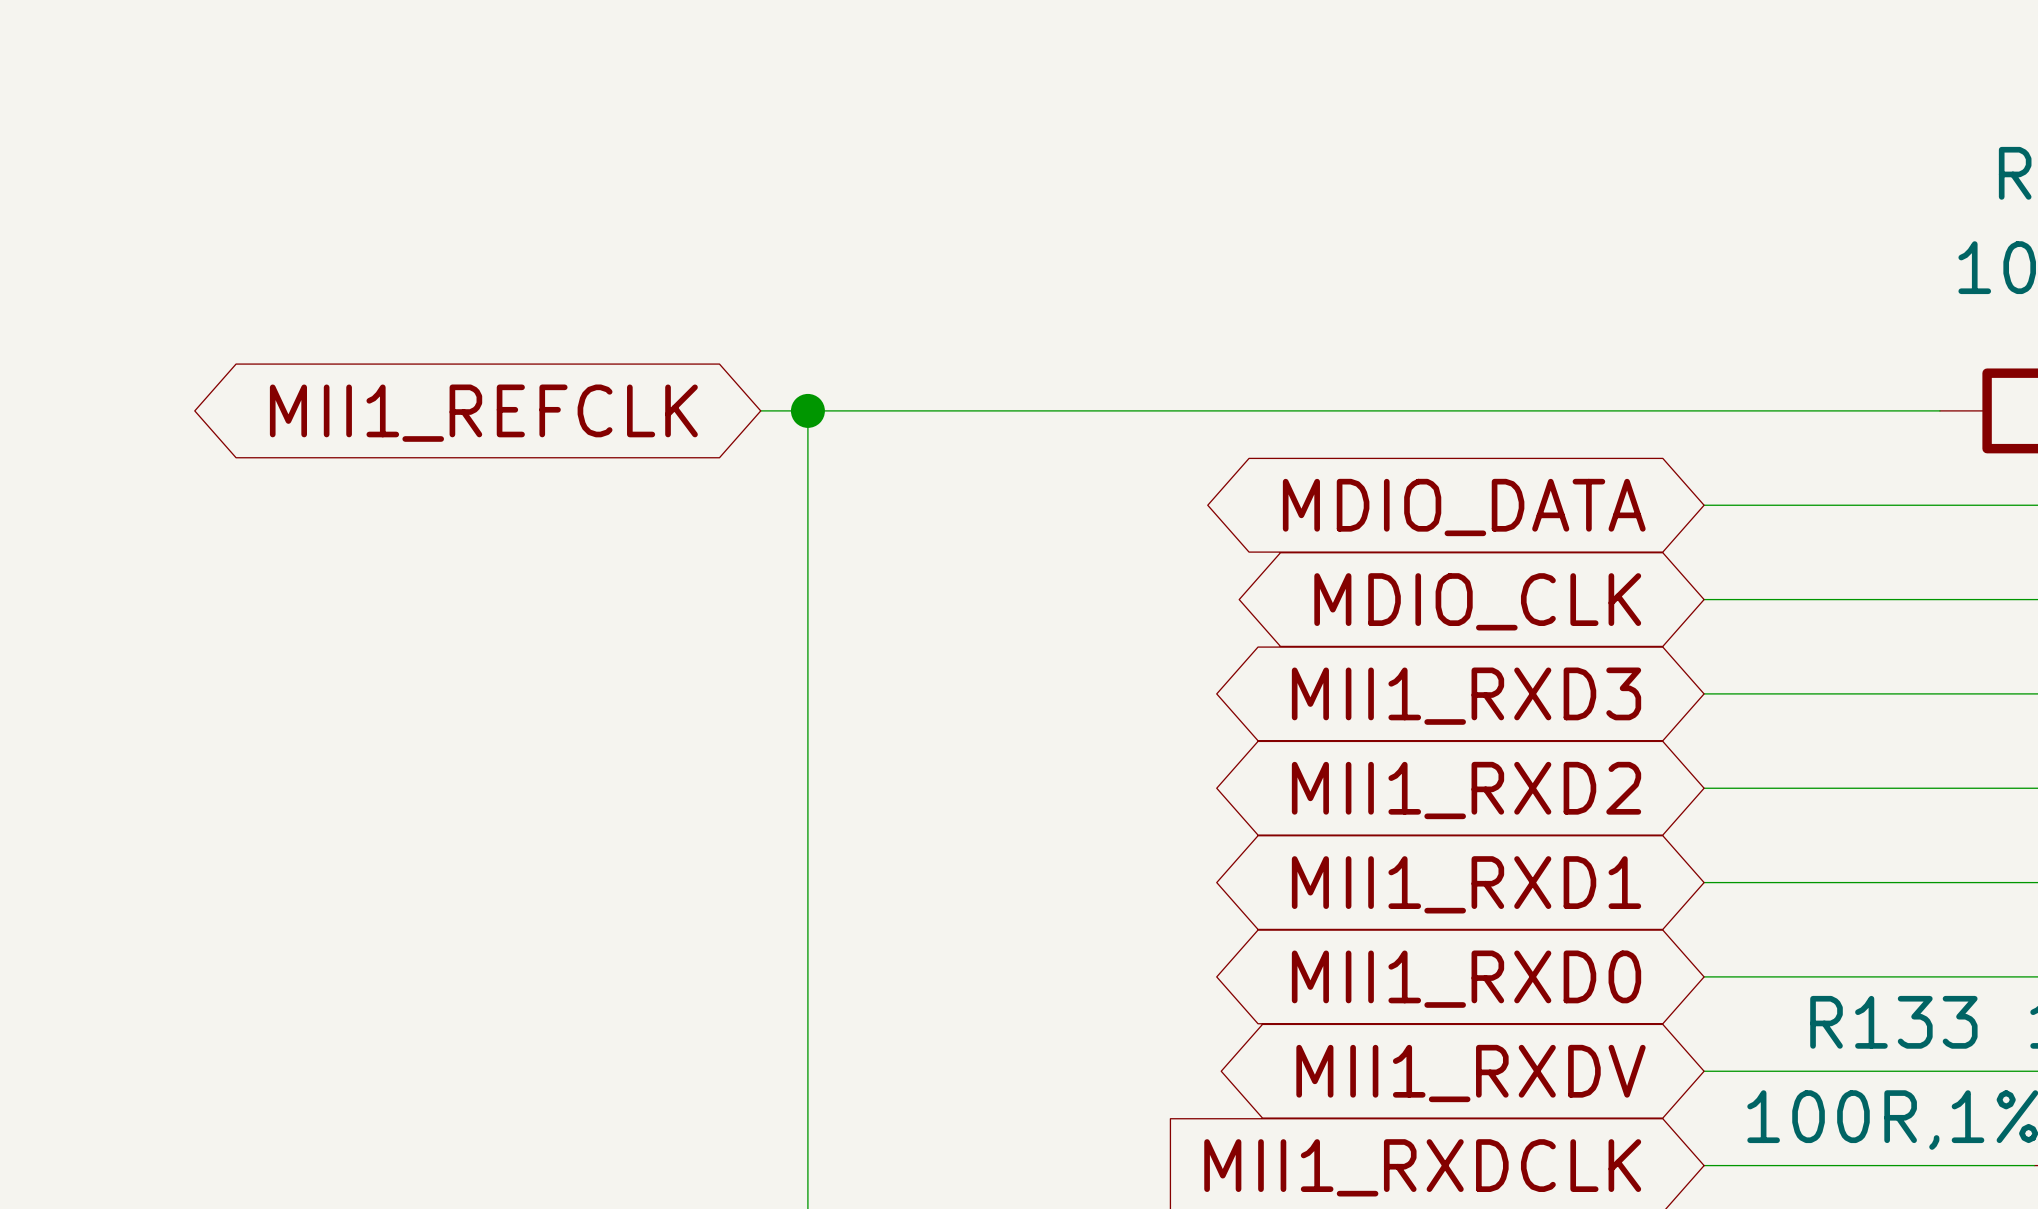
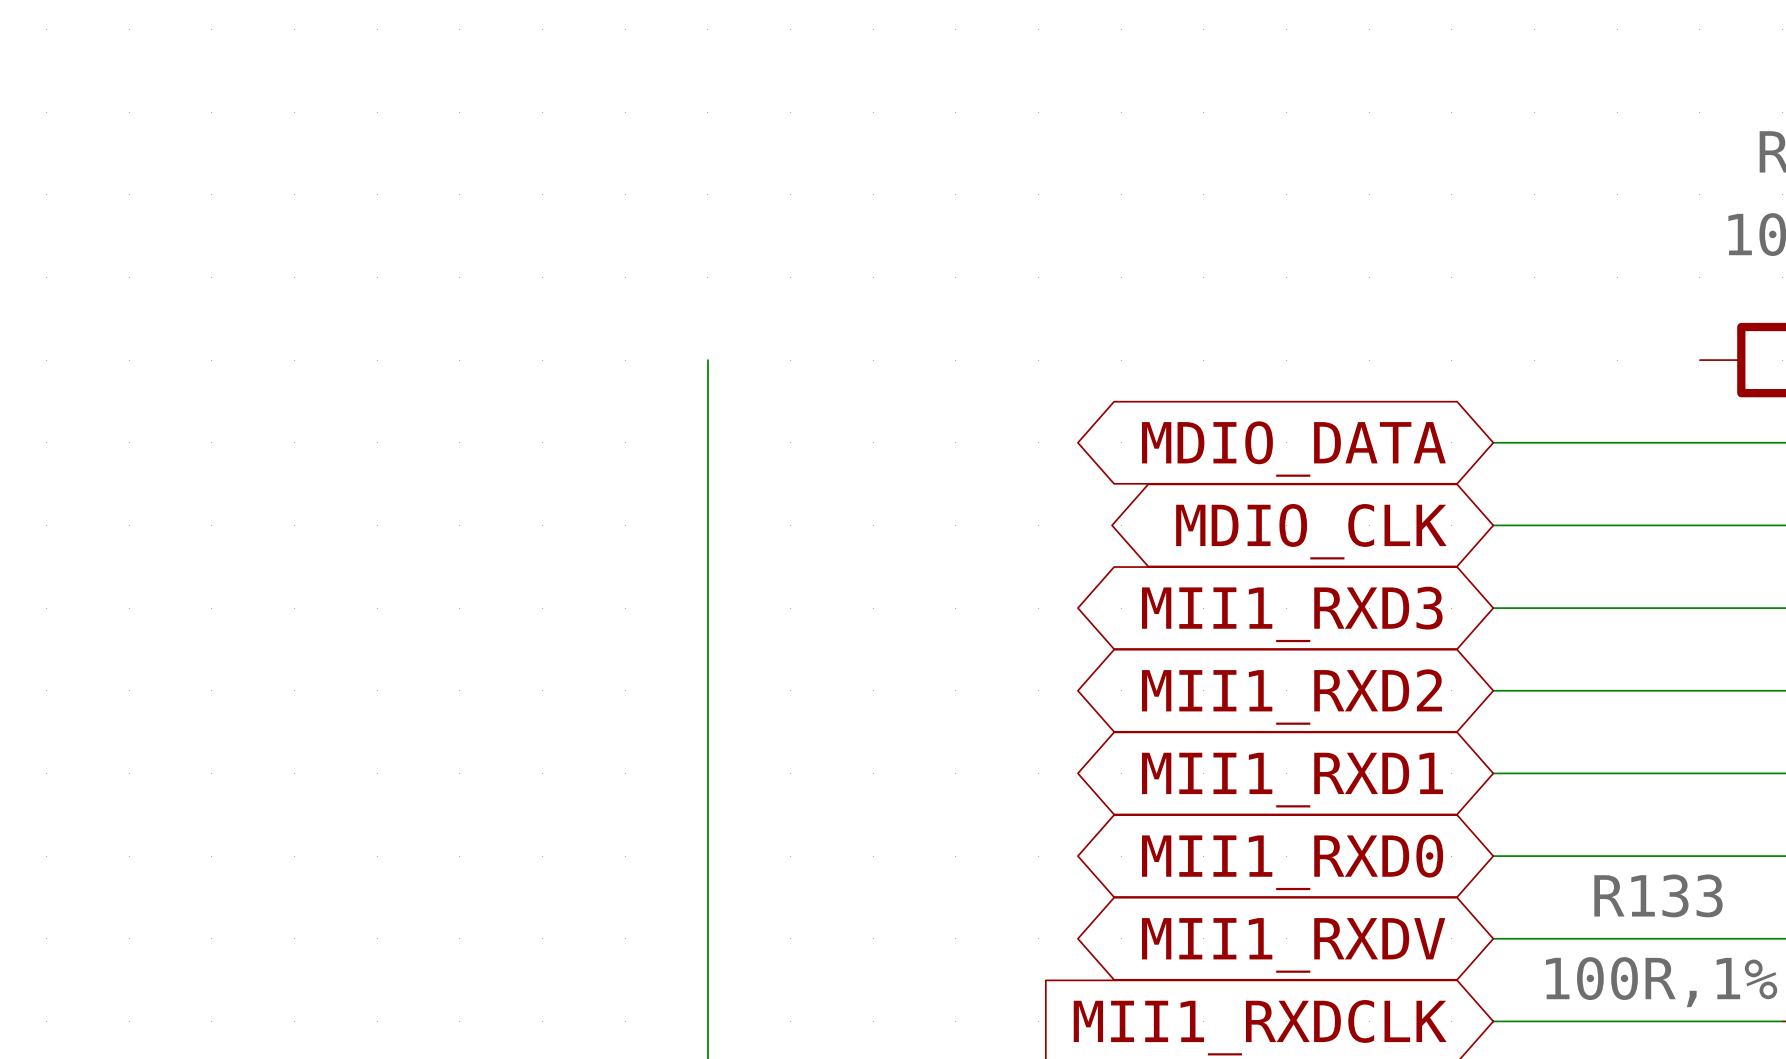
wire: (760, 410) (1939, 410) -> none
junction: (807, 410) -> none
global label: MII1_REFCLK (483, 413) -> none

